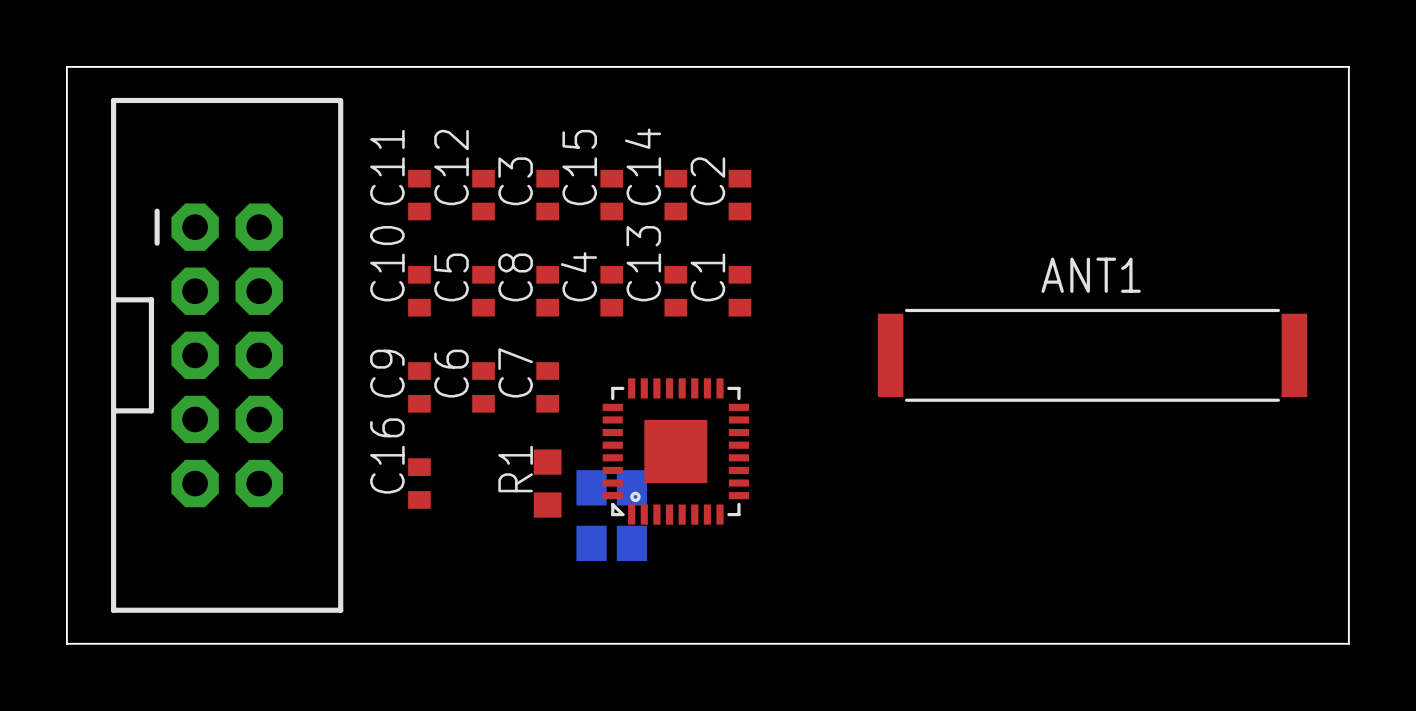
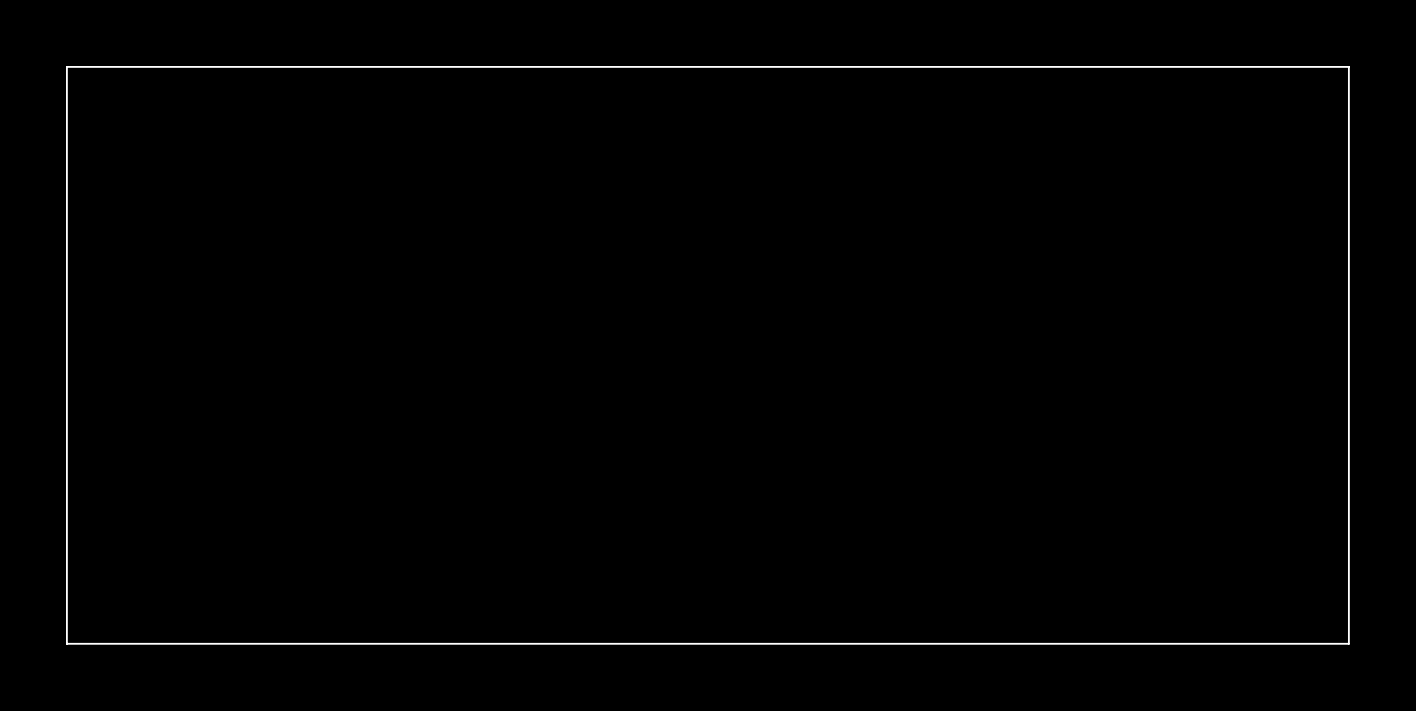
C11: (419, 195) -> none
C12: (483, 195) -> none
C3: (547, 195) -> none
C15: (611, 195) -> none
C14: (675, 195) -> none
C2: (739, 195) -> none
C10: (419, 291) -> none
C5: (483, 291) -> none
C8: (547, 291) -> none
C4: (611, 291) -> none
C13: (675, 291) -> none
C1: (739, 291) -> none
part: (227, 355) -> none
ANT1: (1092, 355) -> none
C9: (419, 387) -> none
C6: (483, 387) -> none
C7: (547, 387) -> none
part: (675, 451) -> none
C16: (419, 483) -> none
R1: (547, 483) -> none
part: (611, 515) -> none

